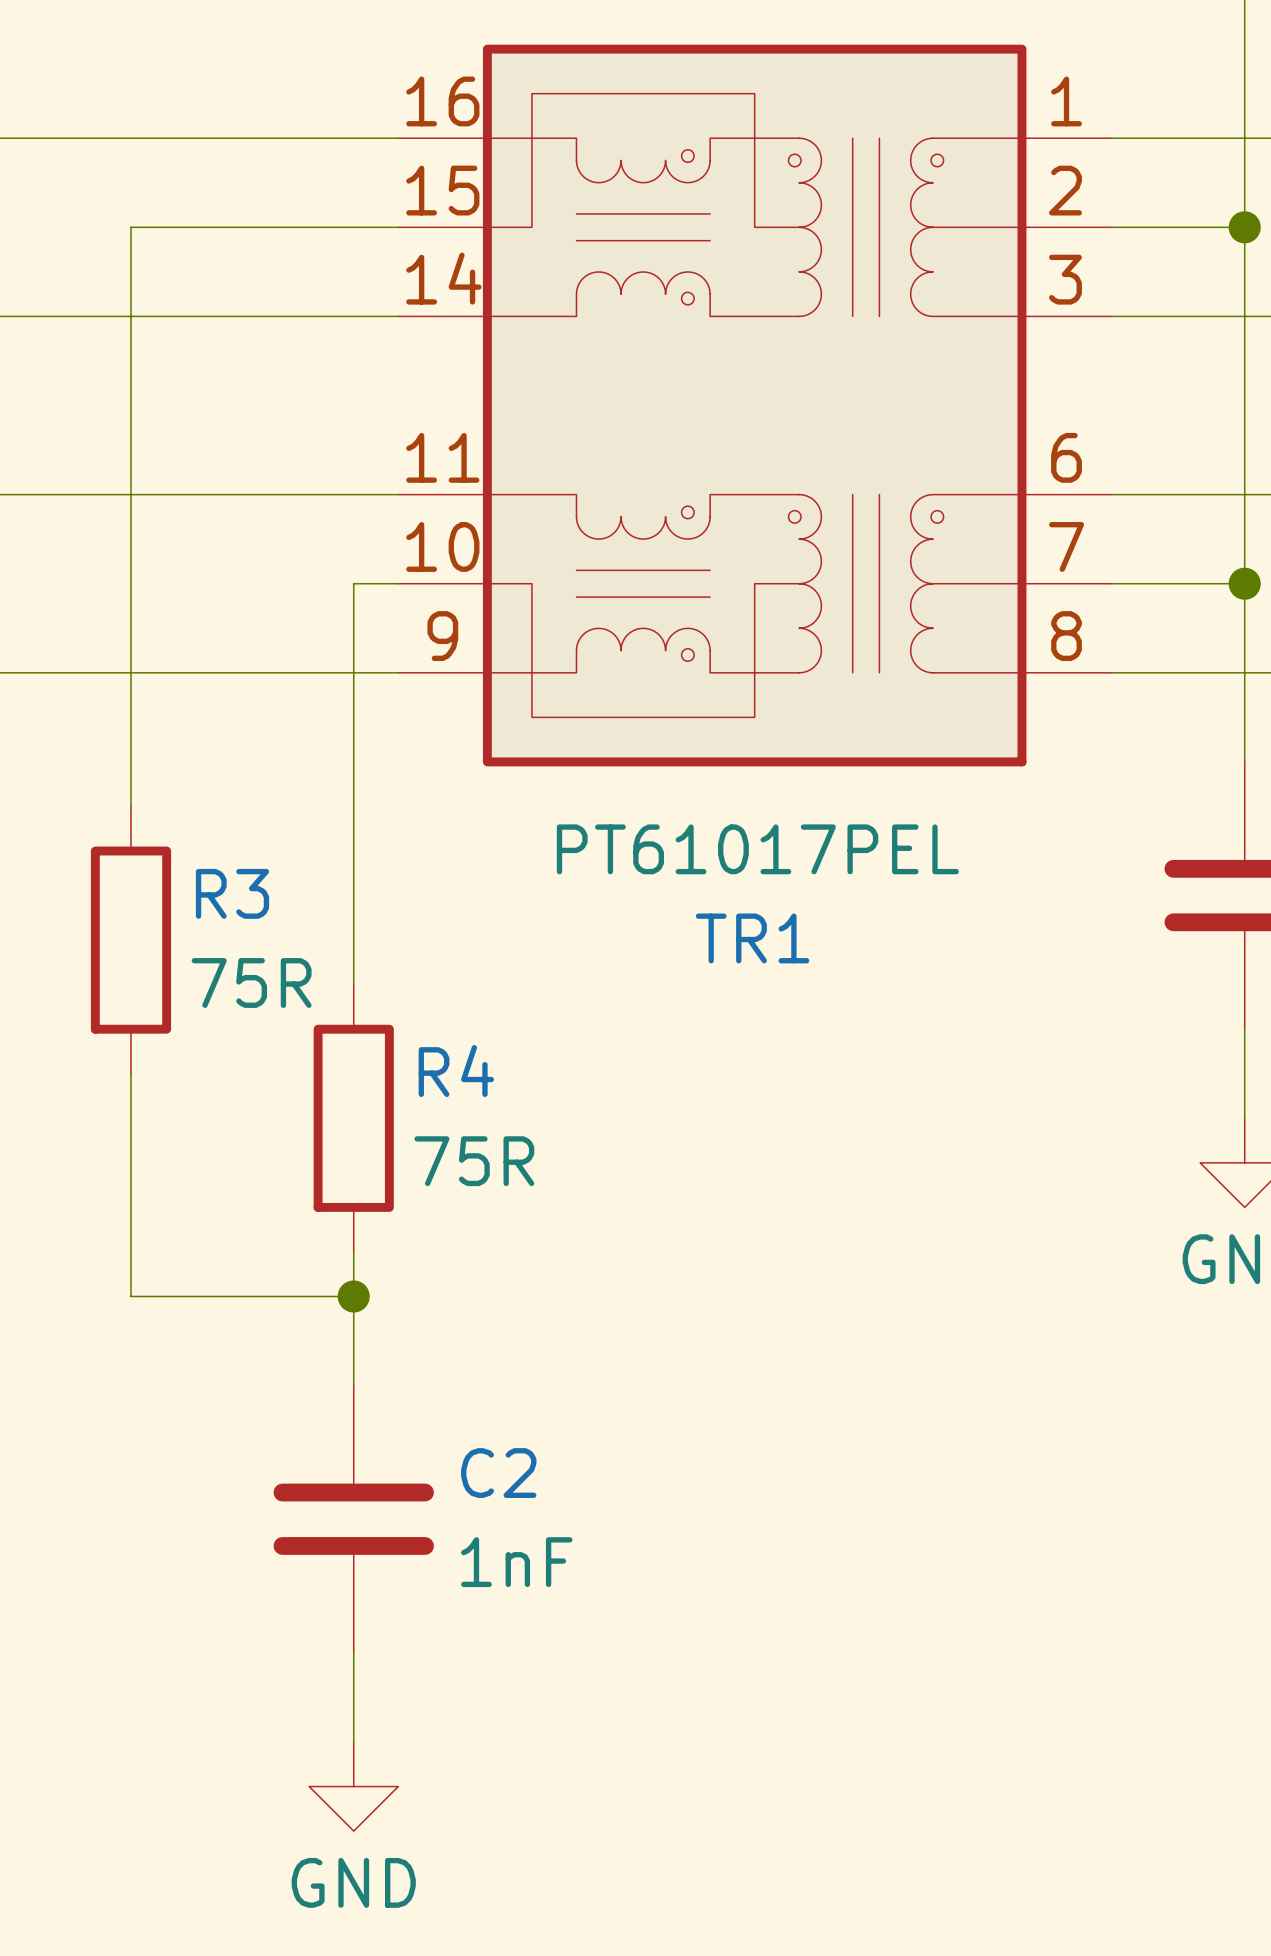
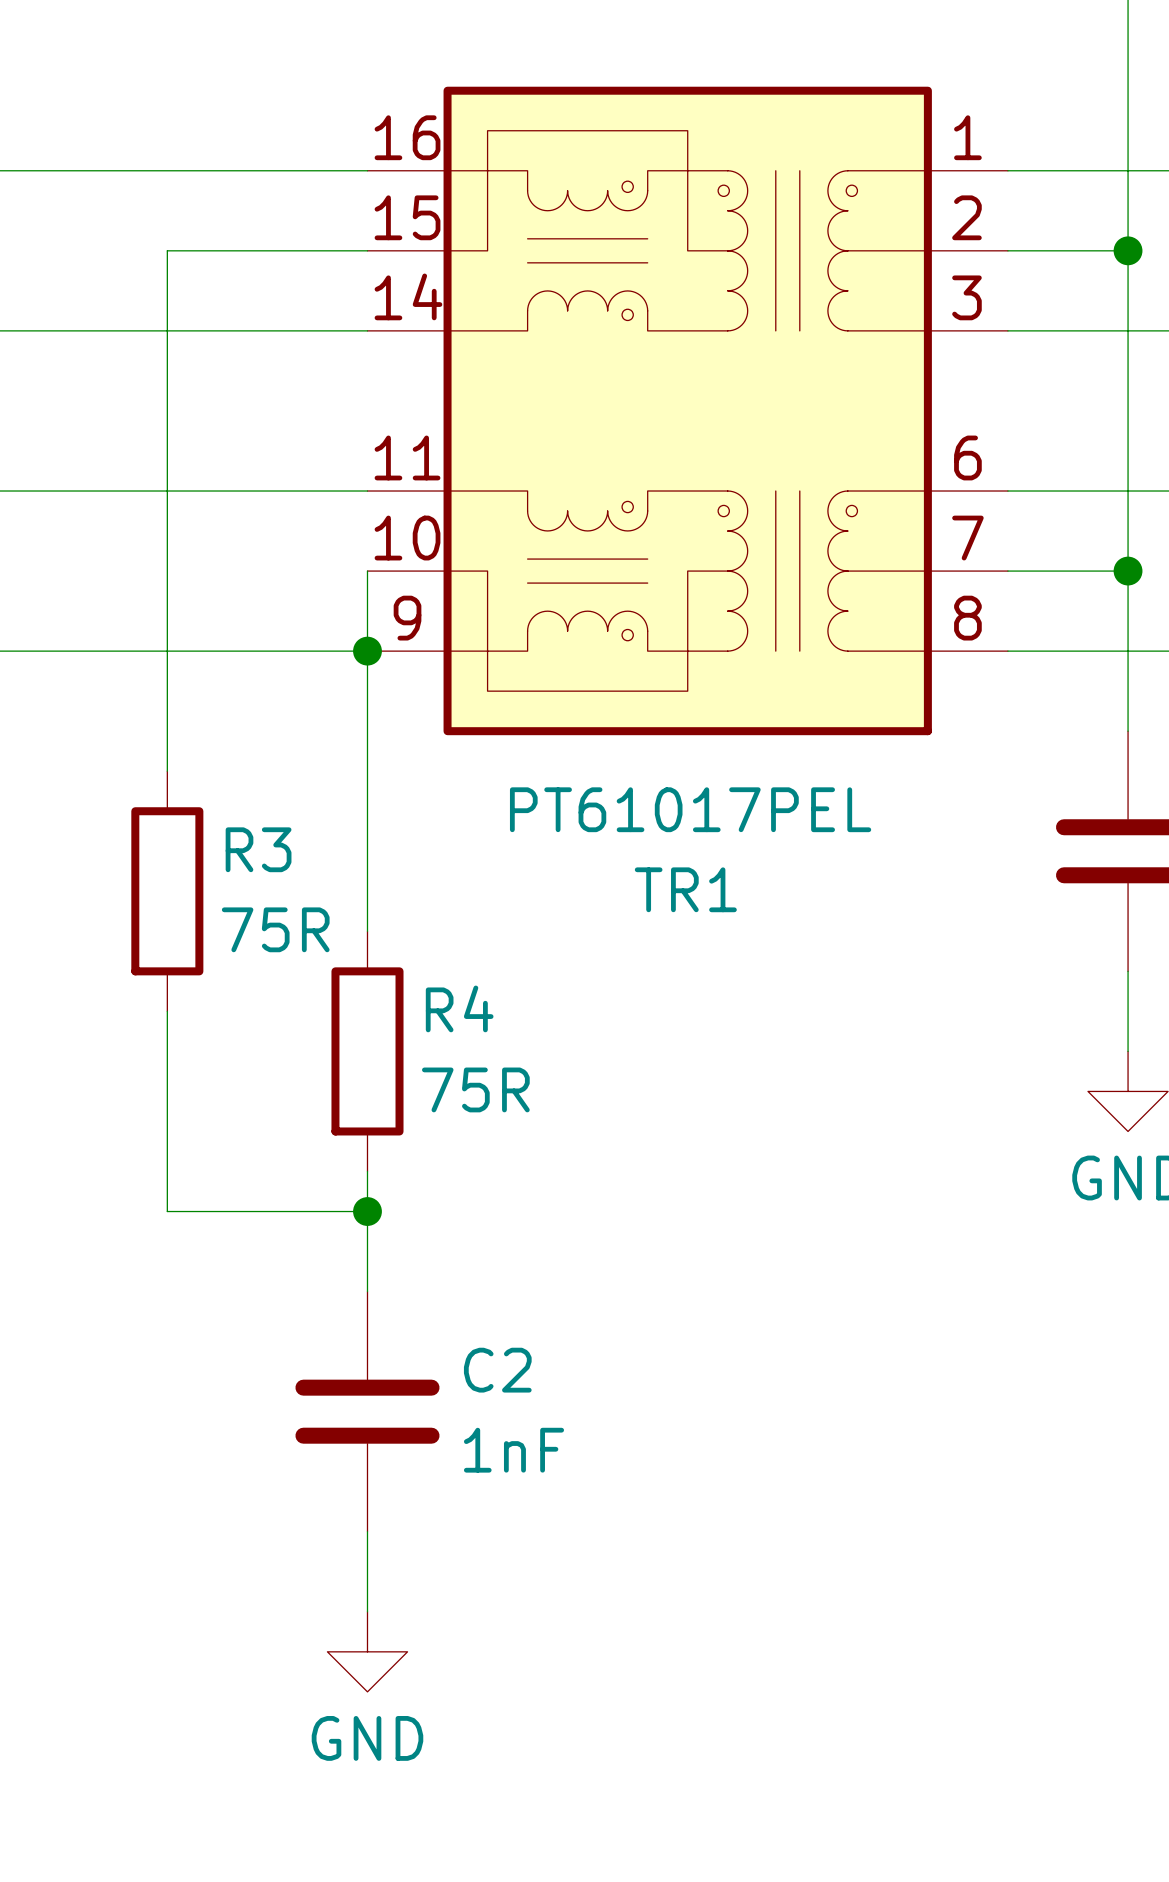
wire: (175, 227) (130, 227) (130, 806) -> (167, 250) (167, 771)
wire: (398, 583) (353, 583) (353, 984) -> (367, 571) (367, 931)
junction: none -> (367, 651)
R3 position: (130, 940) -> (167, 891)
wire: (130, 1073) (130, 1296) (175, 1296) -> (167, 1011) (167, 1211)
R4 position: (353, 1118) -> (367, 1051)
wire: (353, 1251) (353, 1385) -> (367, 1171) (367, 1291)
wire: none -> (327, 1211) (367, 1211)
junction position: (353, 1296) -> (367, 1211)
C2 position: (353, 1519) -> (367, 1411)
wire: (353, 1652) (353, 1741) -> (367, 1531) (367, 1611)
power symbol position: GND (353, 1786) -> GND (367, 1651)

